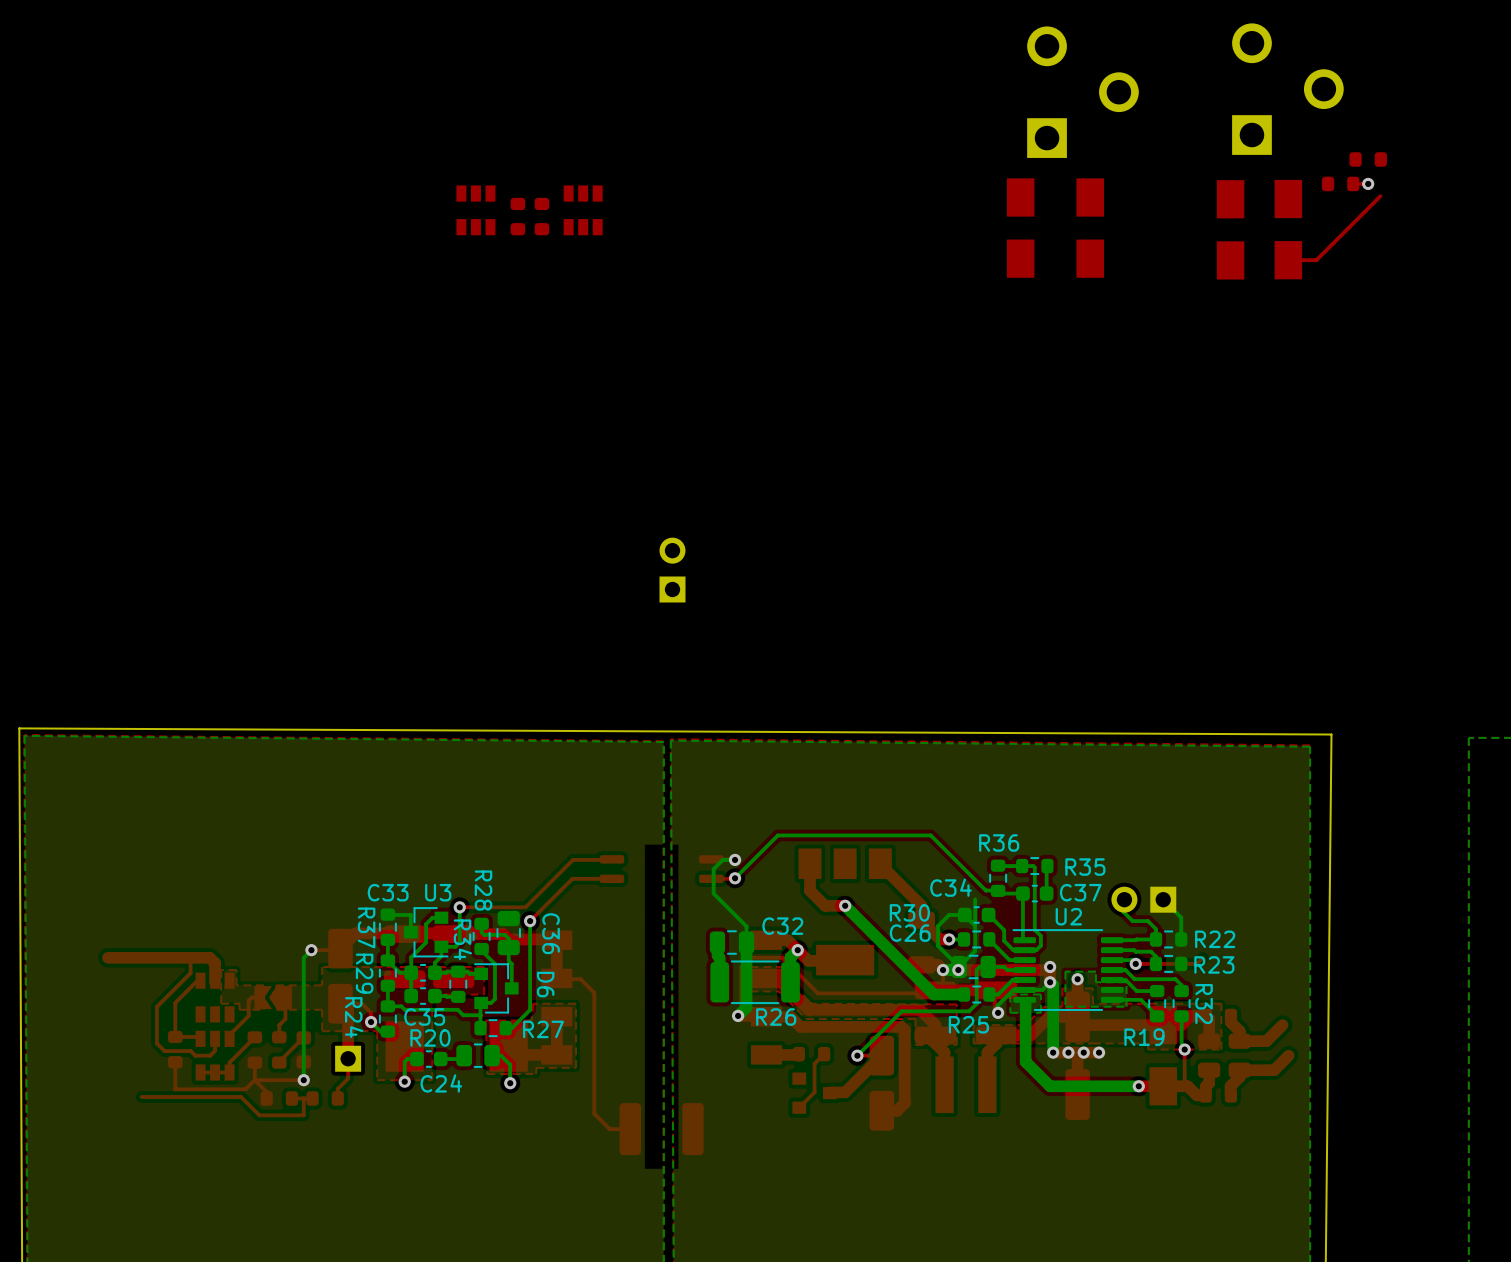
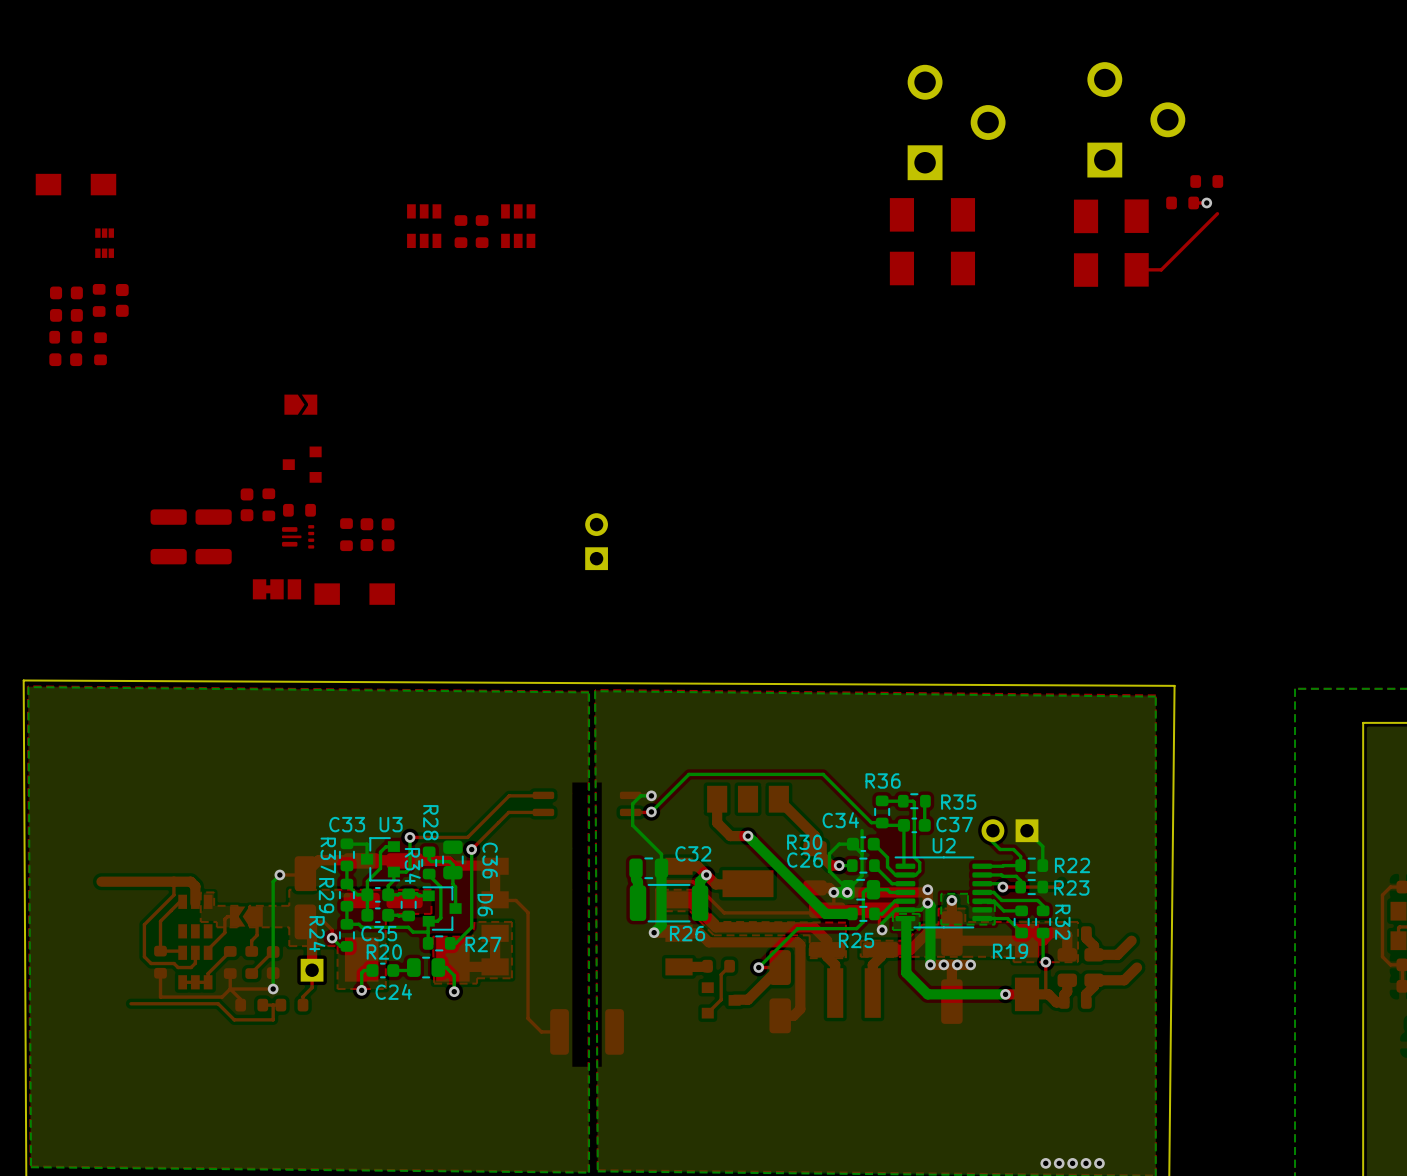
part: none -> (75, 184)
part: none -> (104, 243)
part: none -> (66, 292)
part: none -> (99, 300)
part: none -> (122, 300)
part: none -> (66, 315)
part: none -> (65, 337)
part: none -> (100, 348)
part: none -> (65, 359)
part: none -> (300, 404)
part: none -> (302, 464)
part: none -> (247, 504)
part: none -> (268, 504)
part: none -> (299, 510)
part: none -> (346, 534)
part: none -> (366, 534)
part: none -> (388, 534)
part: none -> (168, 536)
part: none -> (213, 536)
part: none -> (298, 536)
part: none -> (276, 589)
part: none -> (354, 594)

